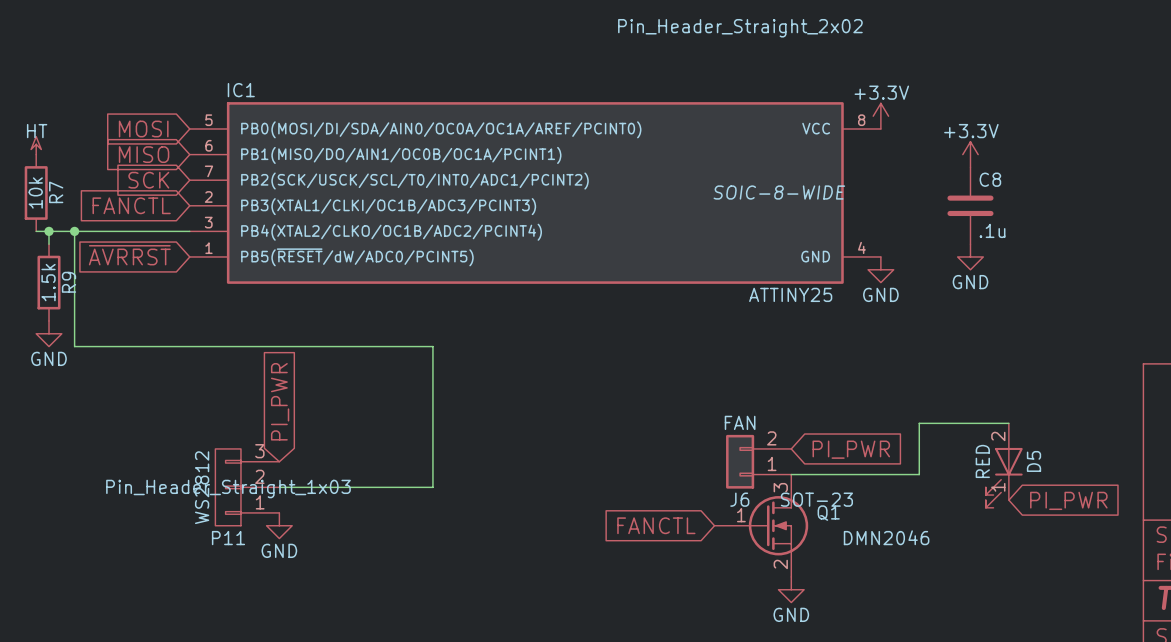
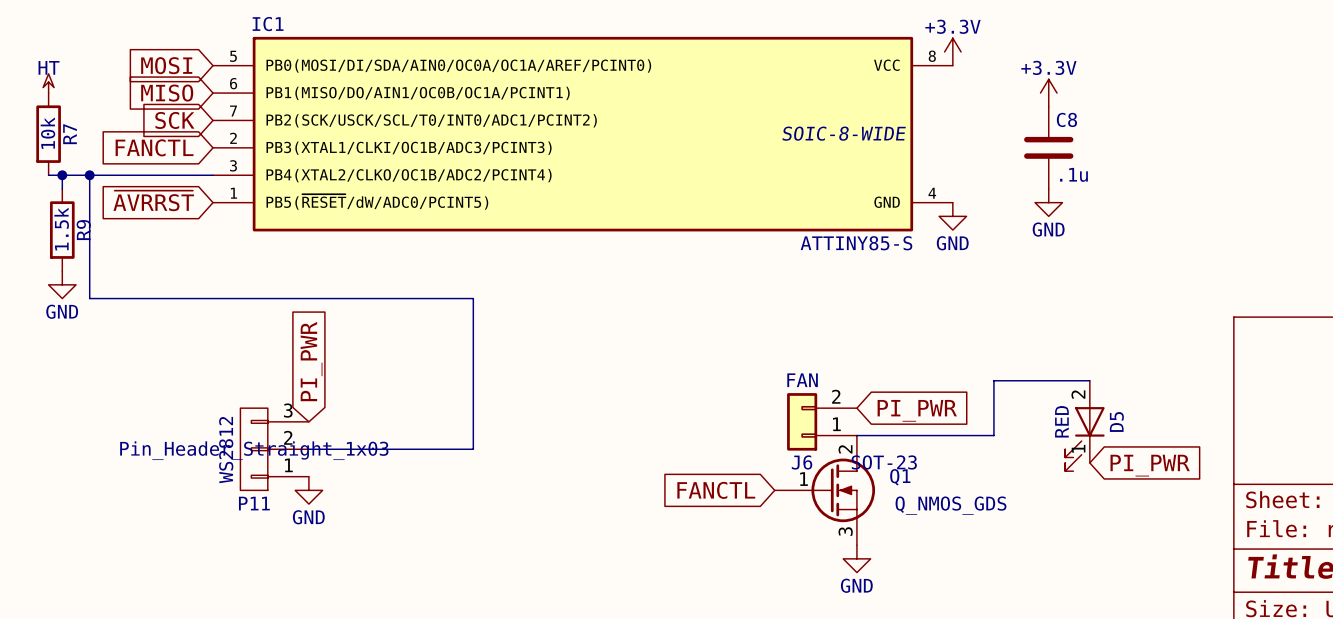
IC1 value: ATTINY25 (790, 294) -> ATTINY85-S (856, 243)
Q1 pin number: 3 (780, 487) -> 2 (845, 449)
Q1 value: DMN2046 (886, 537) -> Q_NMOS_GDS (950, 505)
Q1 pin number: 2 (780, 564) -> 3 (845, 531)

